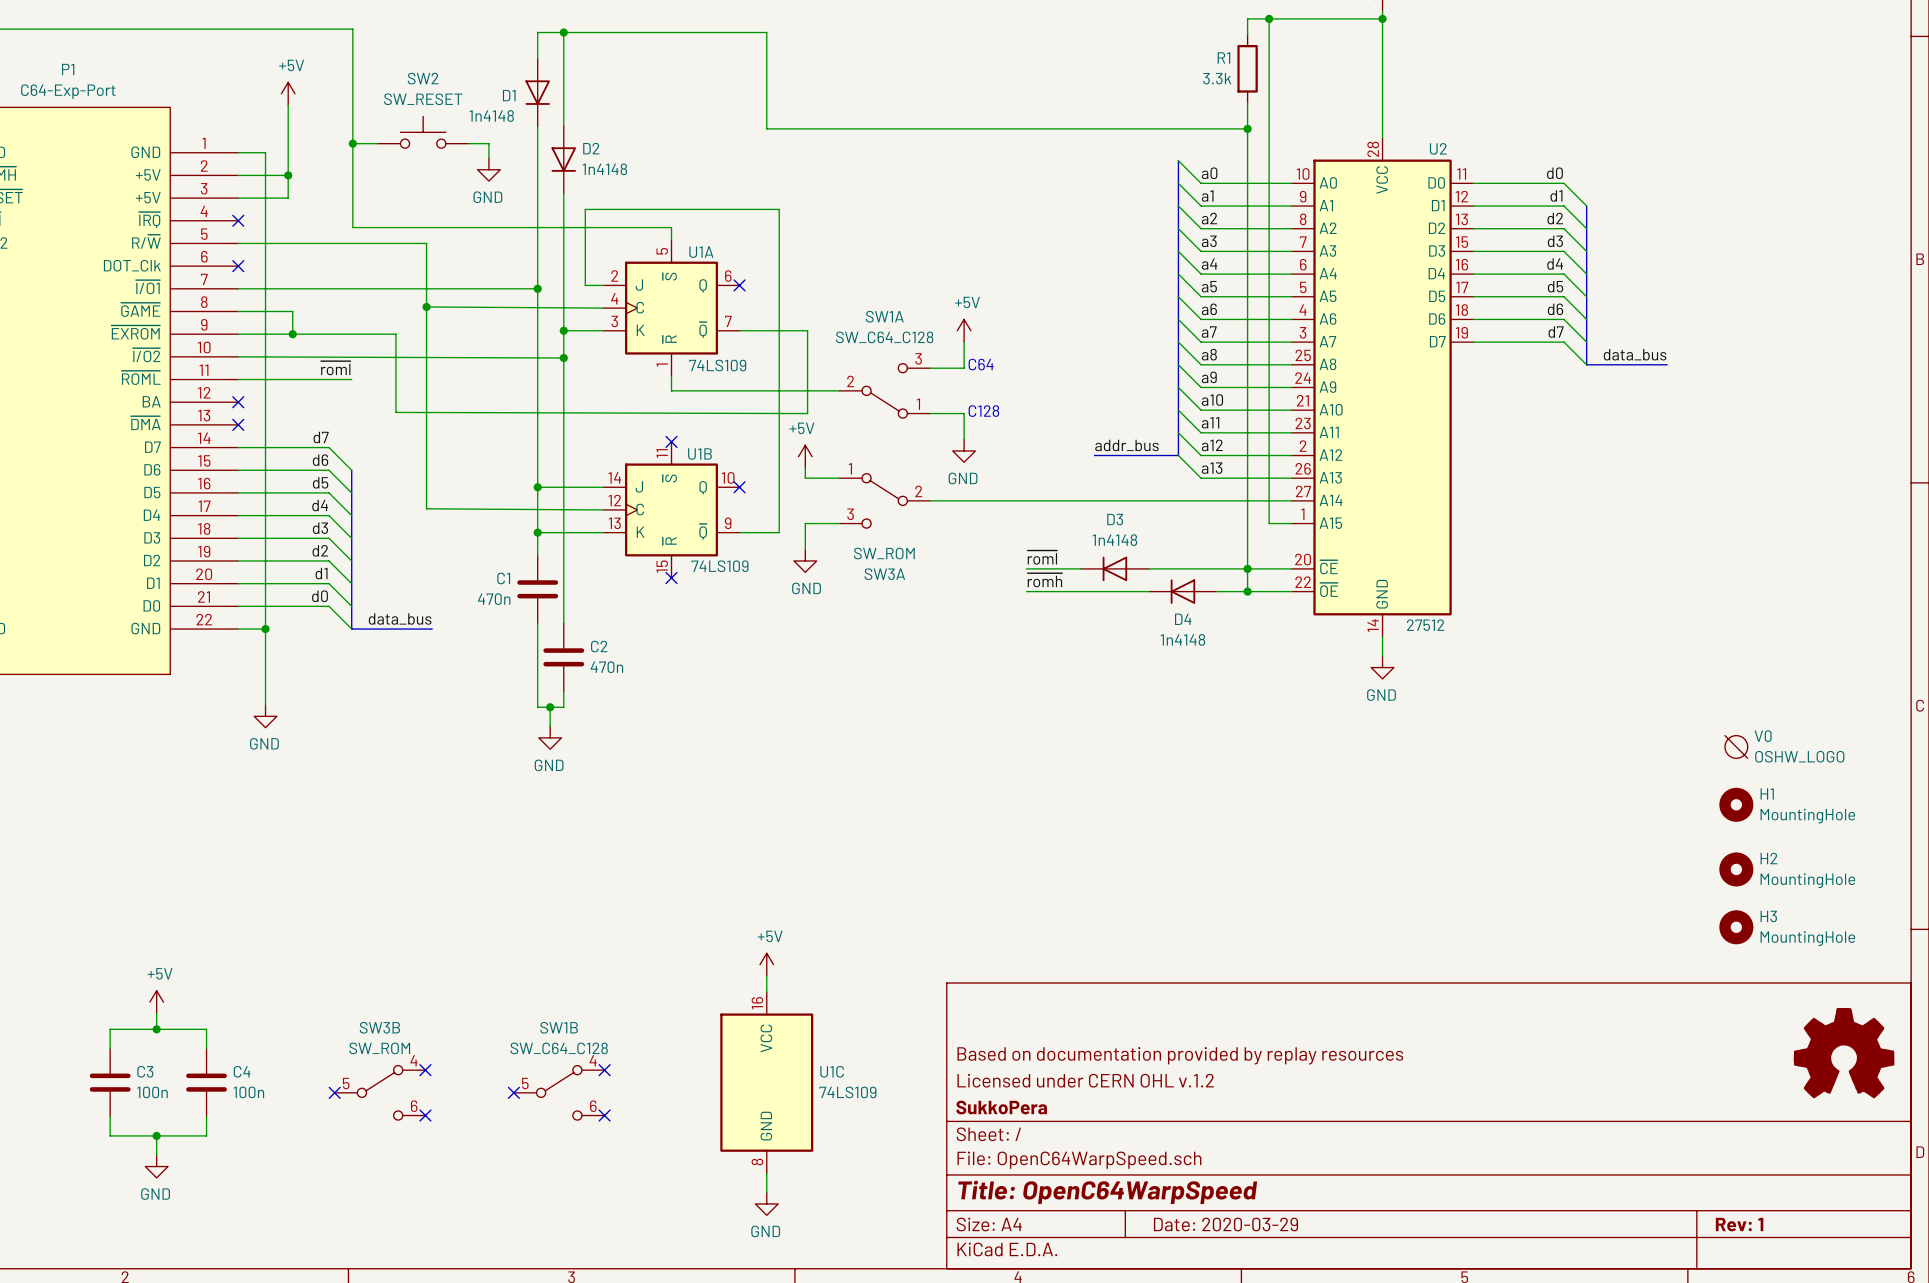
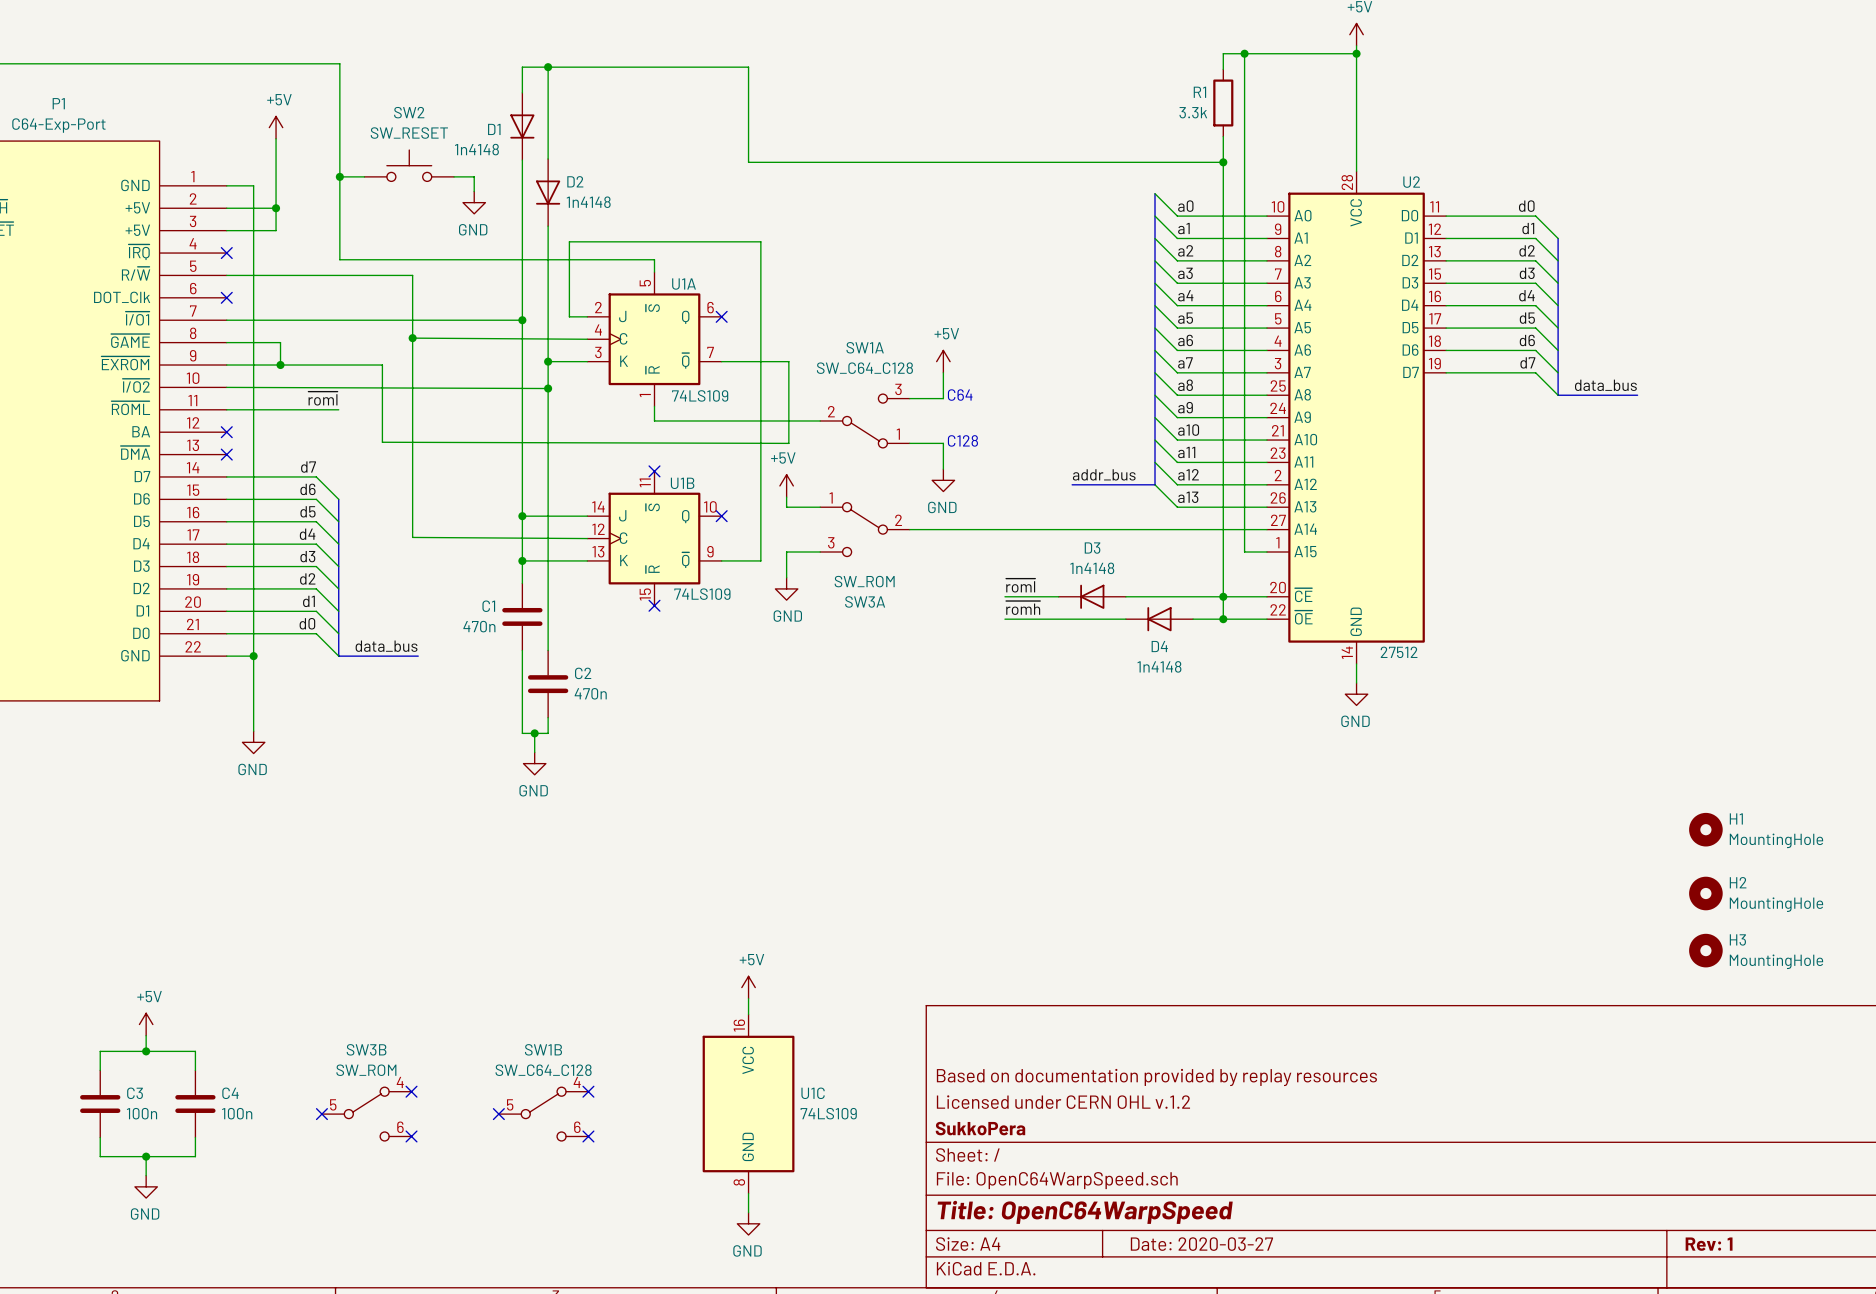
V0: OSHW_LOGO (1736, 746) -> none
power symbol: (1844, 1053) -> none
title block: Date: 2020-03-29 (1226, 1224) -> Date: 2020-03-27 (1201, 1244)

